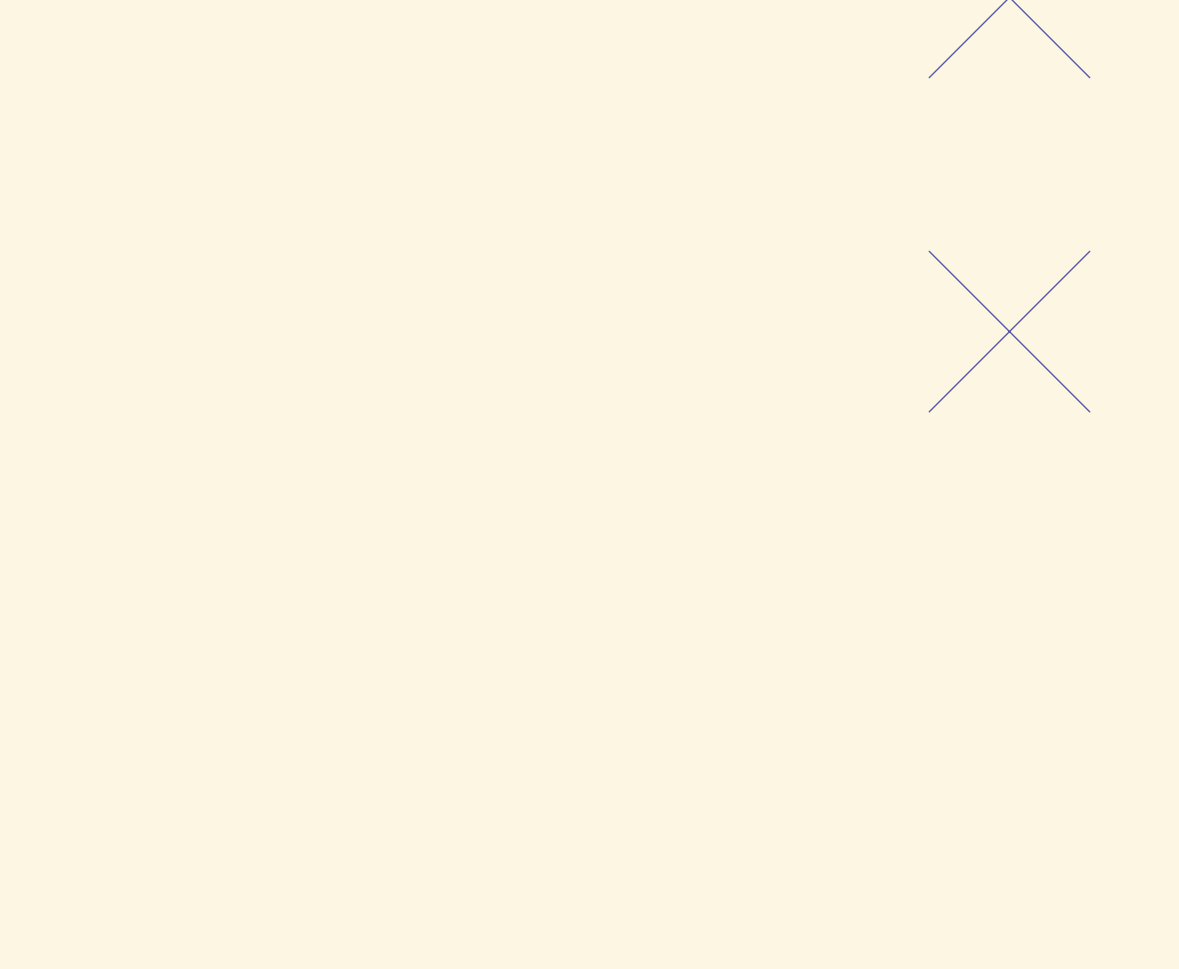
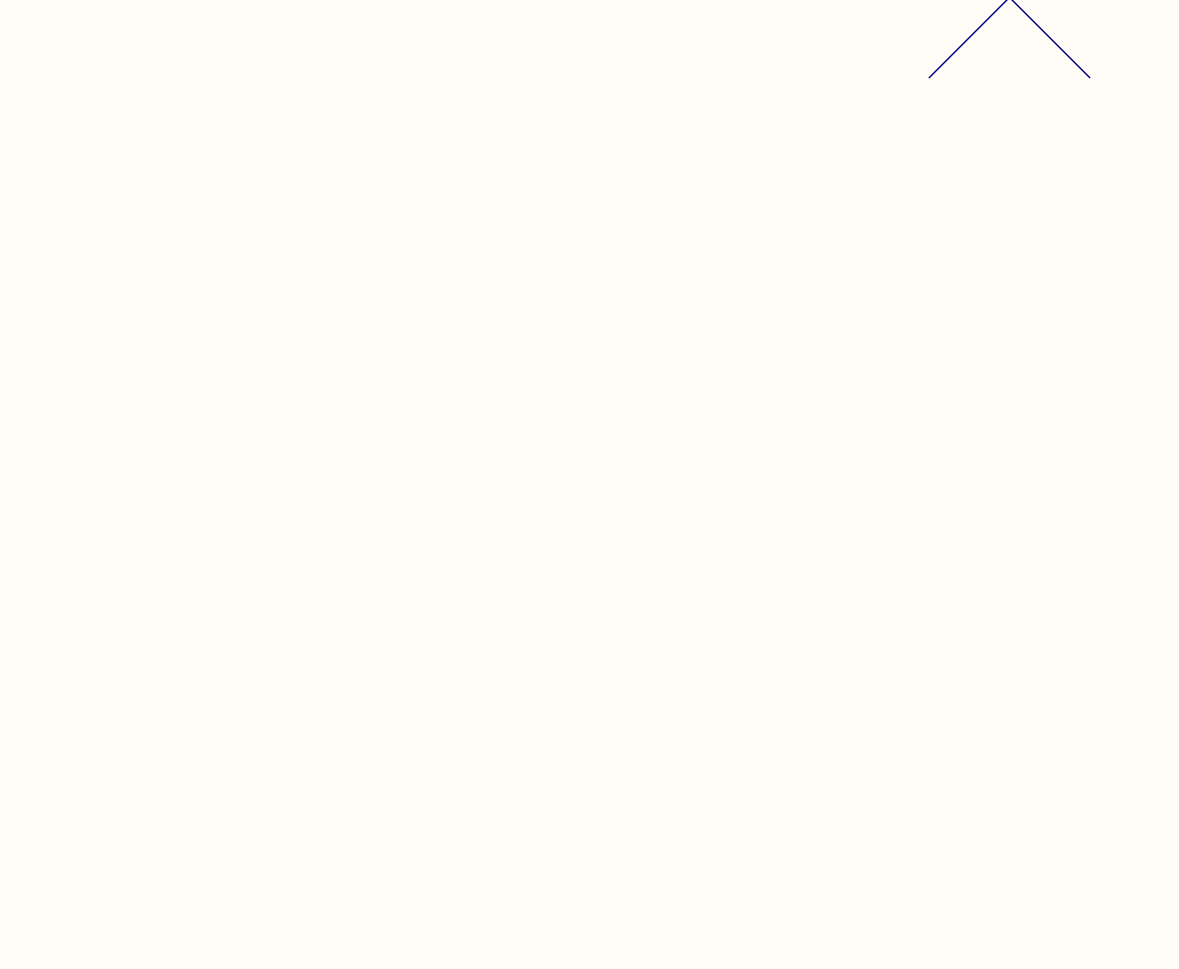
no-connect mark: (1009, 331) -> none

